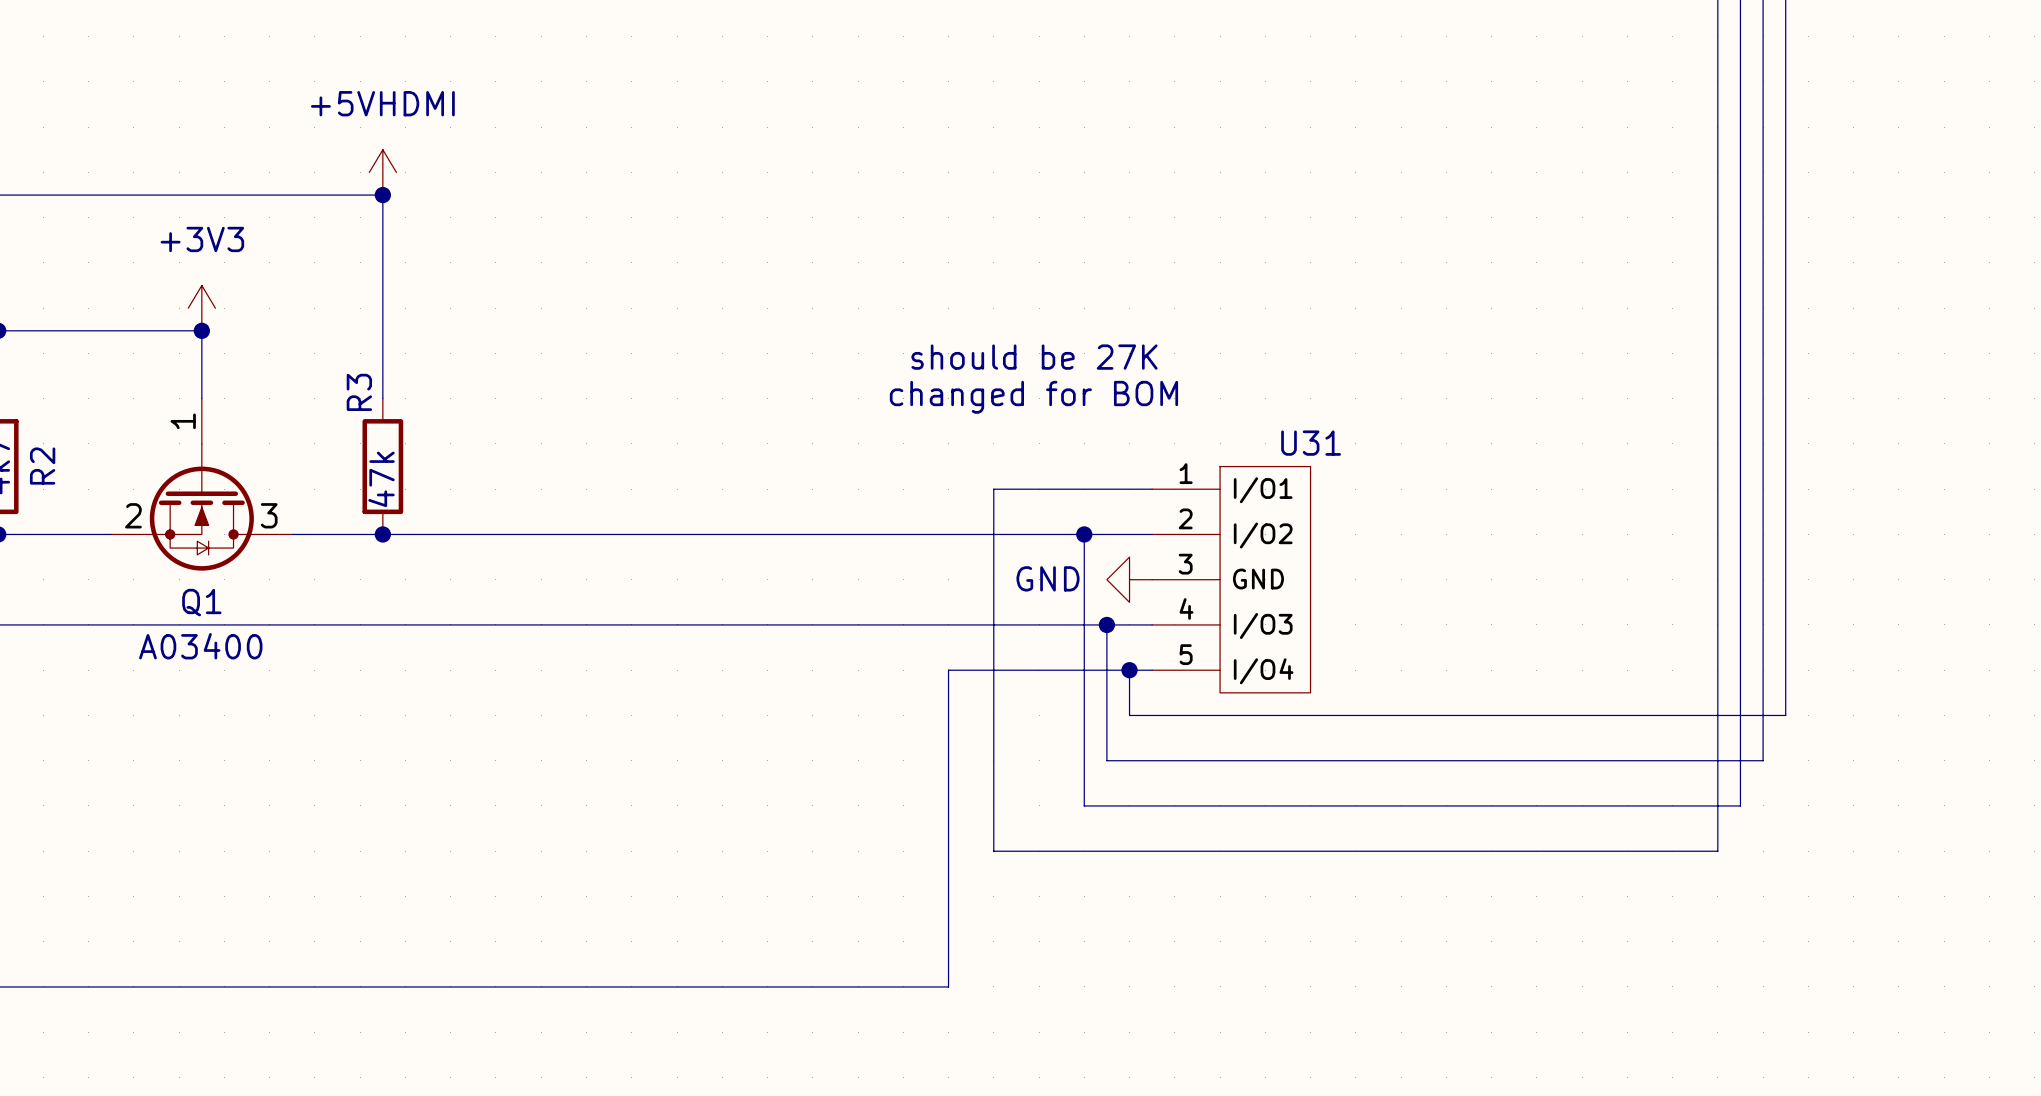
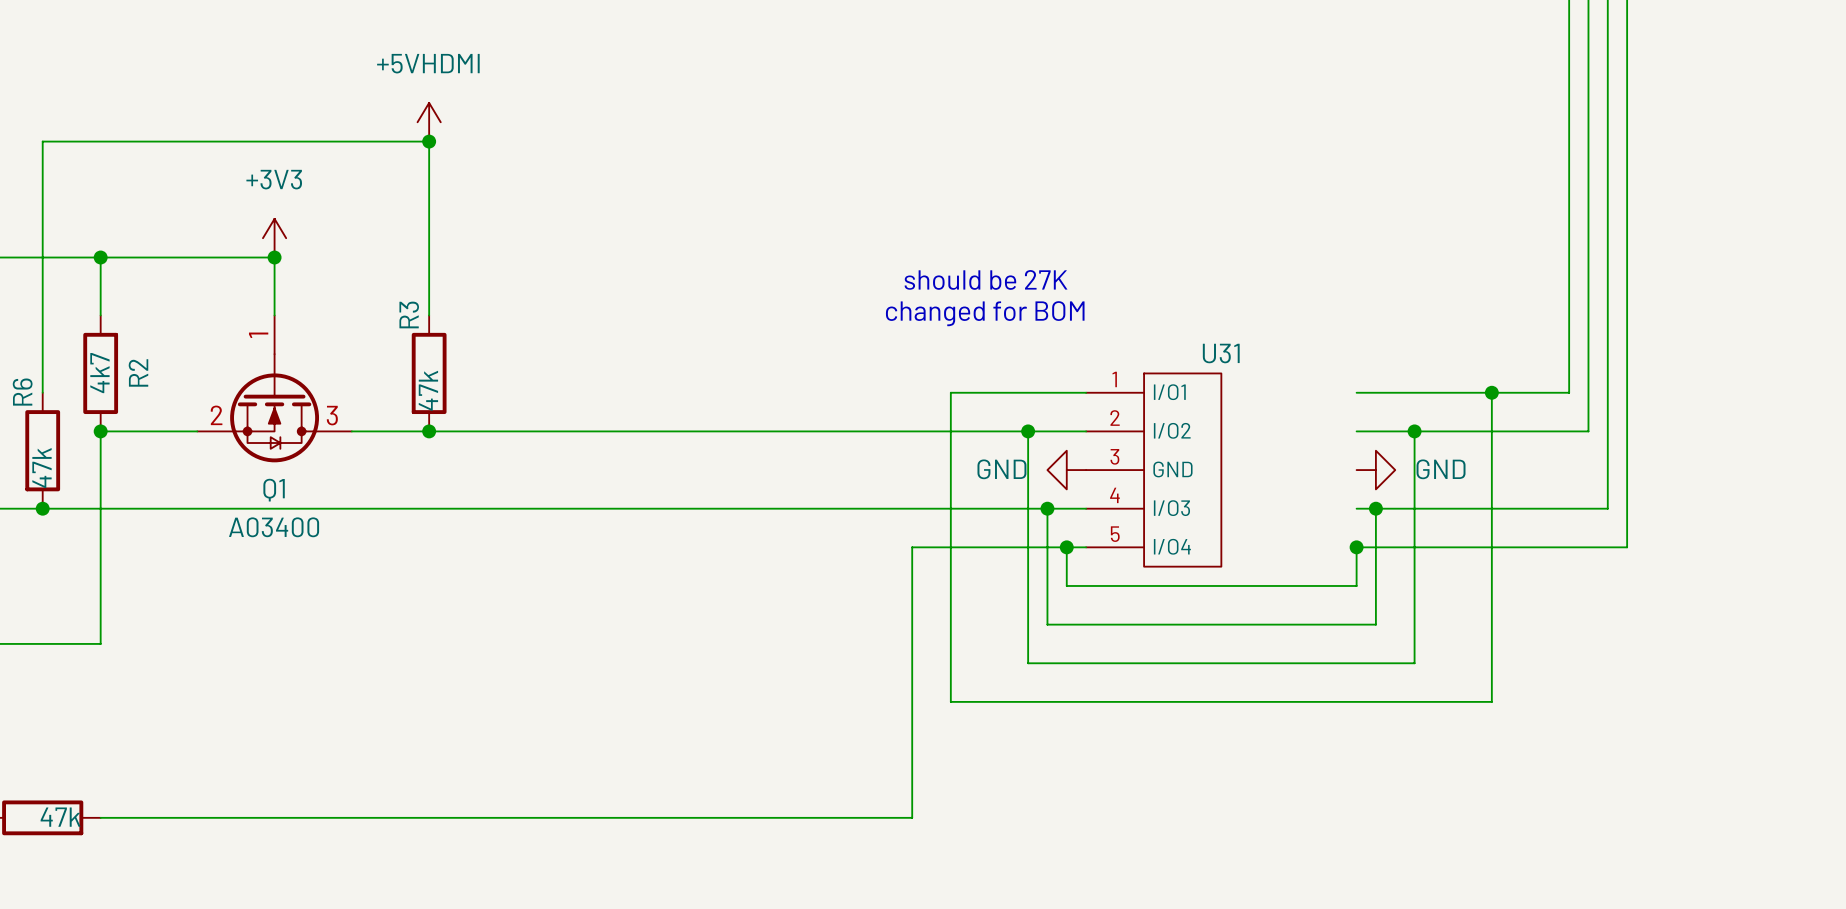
wire: none -> (1356, 392) (1569, 392)
junction: none -> (1491, 392)
wire: (1717, 489) (1717, 851) (1627, 851) -> (1491, 392) (1491, 701)
wire: none -> (1356, 431) (1588, 431)
junction: none -> (1414, 431)
wire: (1740, 534) (1740, 805) (1536, 805) -> (1414, 431) (1414, 663)
power symbol: none -> GND (1375, 470)
wire: none -> (1375, 508) (1375, 624)
junction: none -> (1375, 508)
wire: (1763, 624) (1763, 760) (1491, 760) -> (1607, 508) (1356, 508)
junction: none -> (1356, 547)
wire: (1785, 670) (1785, 715) (1468, 715) -> (1627, 547) (1356, 547) (1356, 585)

